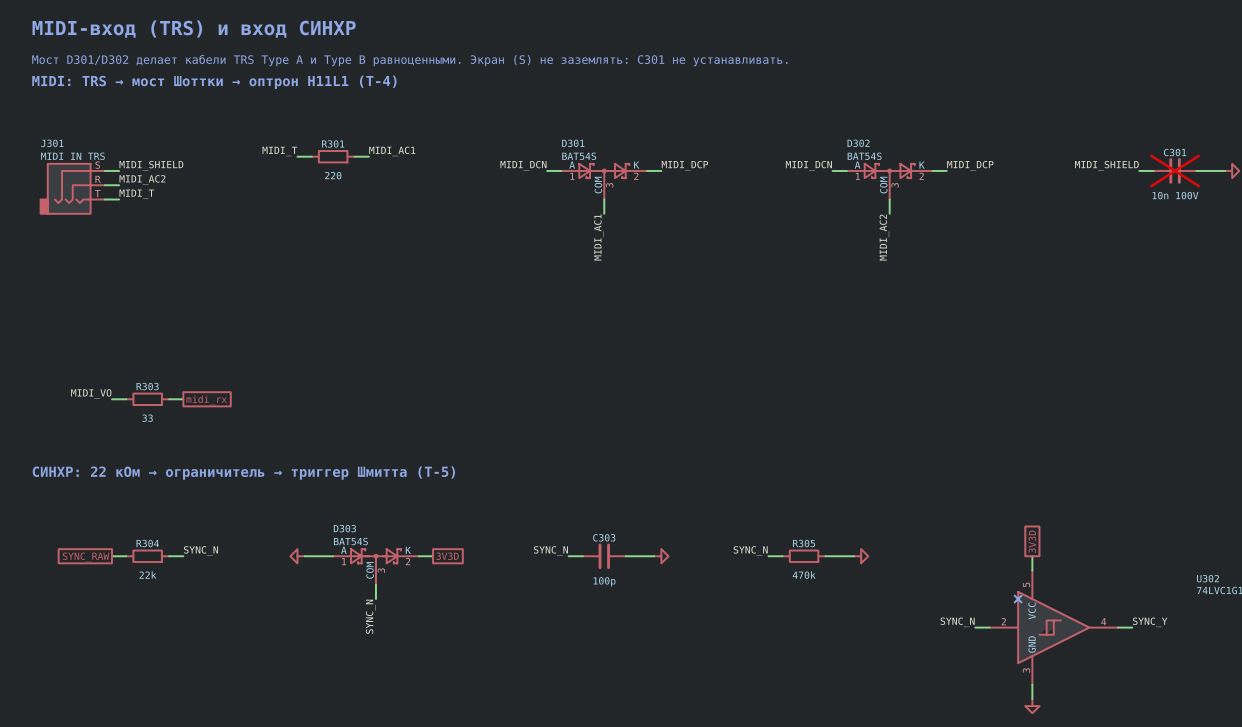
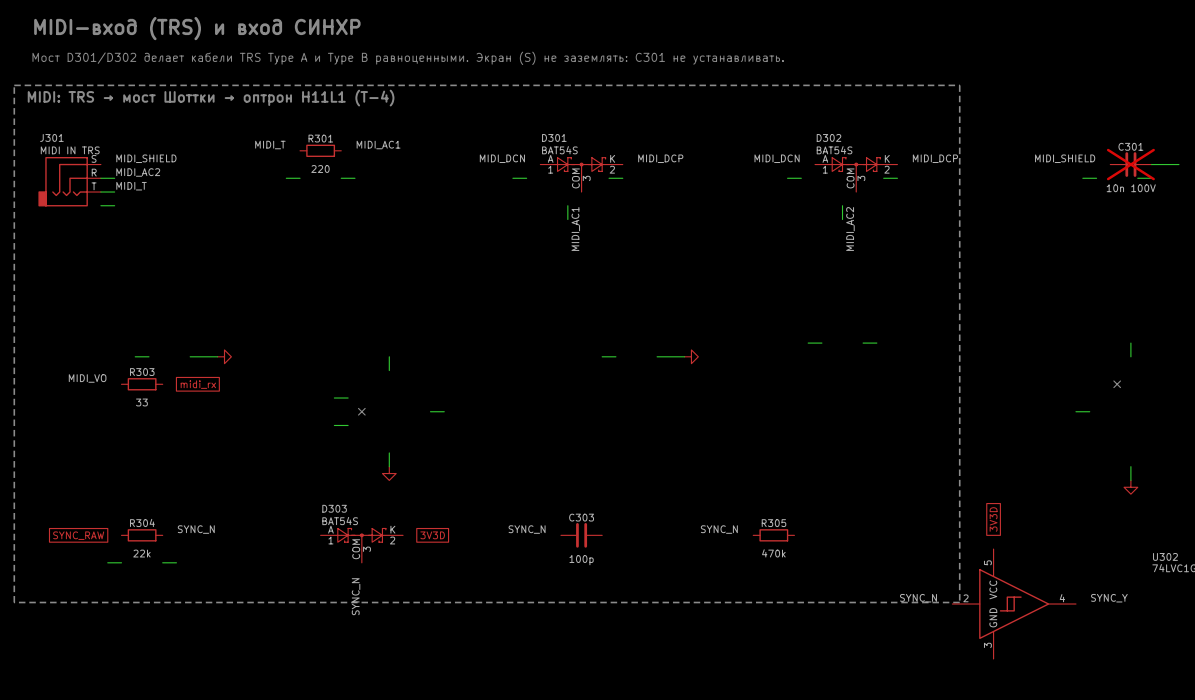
text position: MIDI: TRS → мост Шоттки → оптрон H11L1 (Т-4) (214, 82) -> MIDI: TRS → мост Шоттки → оптрон H11L1 (Т-4) (211, 98)
line: none -> (14, 85) (959, 85) (959, 602) (14, 602) (14, 85)
wire: (297, 156) (311, 156) -> (286, 178) (300, 178)
wire: (354, 156) (368, 156) -> (341, 178) (354, 178)
wire: (104, 170) (119, 170) -> (100, 205) (114, 205)
wire: (547, 170) (561, 170) -> (512, 178) (526, 178)
wire: (647, 170) (661, 170) -> (609, 178) (622, 178)
wire: (832, 170) (846, 170) -> (787, 178) (801, 178)
wire: (932, 170) (946, 170) -> (883, 178) (897, 178)
wire: (1139, 170) (1153, 170) -> (1082, 178) (1096, 178)
power symbol: (1232, 170) -> none
wire: none -> (1137, 178) (1151, 178)
wire: (604, 199) (604, 213) -> (567, 205) (567, 219)
wire: (889, 199) (889, 213) -> (842, 205) (842, 219)
wire: none -> (808, 343) (821, 343)
wire: none -> (863, 343) (876, 343)
wire: none -> (1130, 343) (1130, 356)
wire: none -> (190, 356) (217, 356)
power symbol: none -> (224, 356)
wire: none -> (389, 356) (389, 370)
wire: none -> (602, 356) (615, 356)
wire: none -> (657, 356) (684, 356)
power symbol: none -> (691, 356)
wire: (111, 399) (126, 399) -> (135, 356) (148, 356)
wire: (169, 399) (183, 399) -> none
no-connect mark: none -> (1117, 384)
wire: none -> (334, 398) (348, 398)
no-connect mark: none -> (361, 411)
wire: none -> (1075, 411) (1089, 411)
wire: none -> (334, 425) (348, 425)
text: СИНХР: 22 кОм → ограничитель → триггер Шмитта (Т-5) (243, 473) -> none
wire: none -> (1130, 466) (1130, 480)
power symbol: none -> (389, 473)
power symbol: none -> (1130, 487)
wire: (111, 556) (126, 556) -> (107, 562) (121, 562)
wire: (169, 556) (183, 556) -> (162, 562) (176, 562)
power symbol: (297, 556) -> none
wire: (304, 556) (333, 556) -> none
wire: (418, 556) (433, 556) -> (430, 411) (444, 411)
wire: (568, 556) (582, 556) -> none
wire: (625, 556) (654, 556) -> none
power symbol: (661, 556) -> none
wire: (768, 556) (782, 556) -> none
wire: (825, 556) (854, 556) -> none
power symbol: (861, 556) -> none
wire: (1032, 556) (1032, 570) -> none
wire: (375, 584) (375, 599) -> (389, 452) (389, 466)
no-connect mark: (1018, 599) -> none
wire: (975, 627) (989, 627) -> none
wire: (1117, 627) (1132, 627) -> none
wire: (1032, 684) (1032, 698) -> none
power symbol: (1032, 706) -> none

